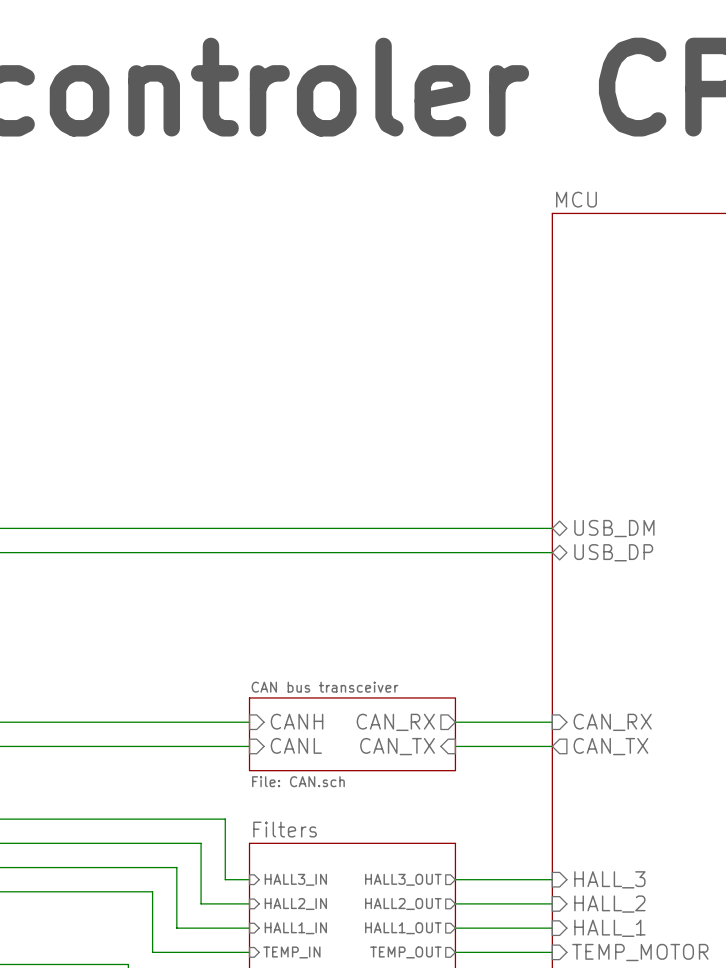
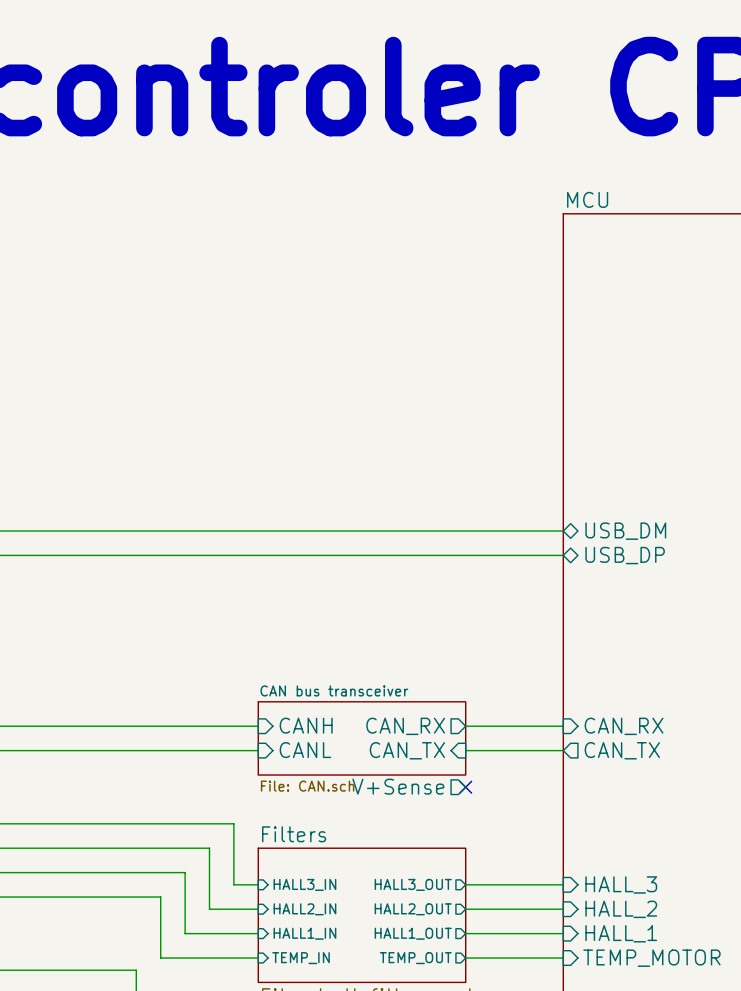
sheet pin: none -> V+Sense (398, 786)
no-connect mark: none -> (465, 787)

